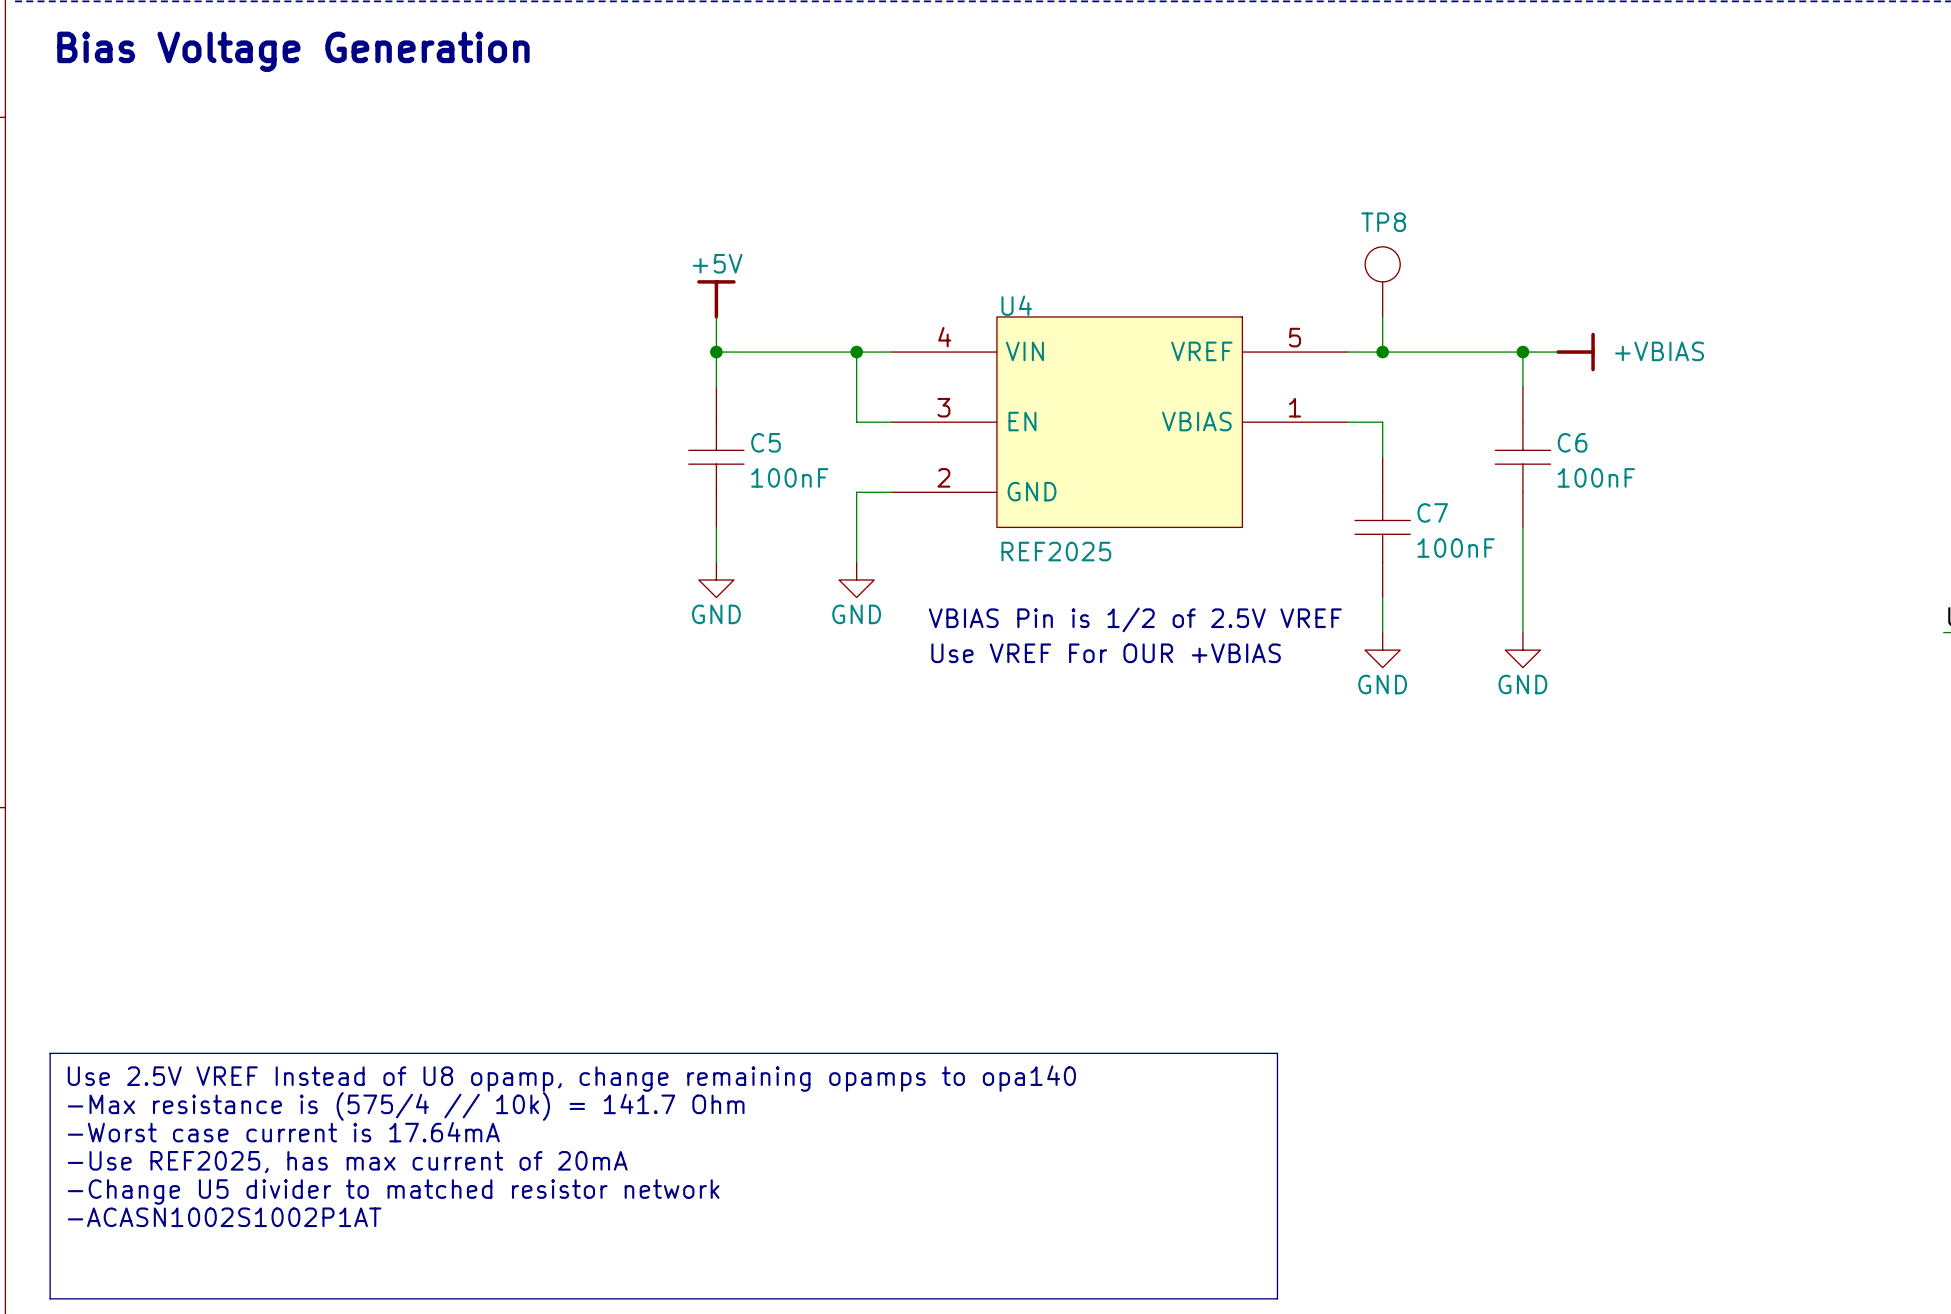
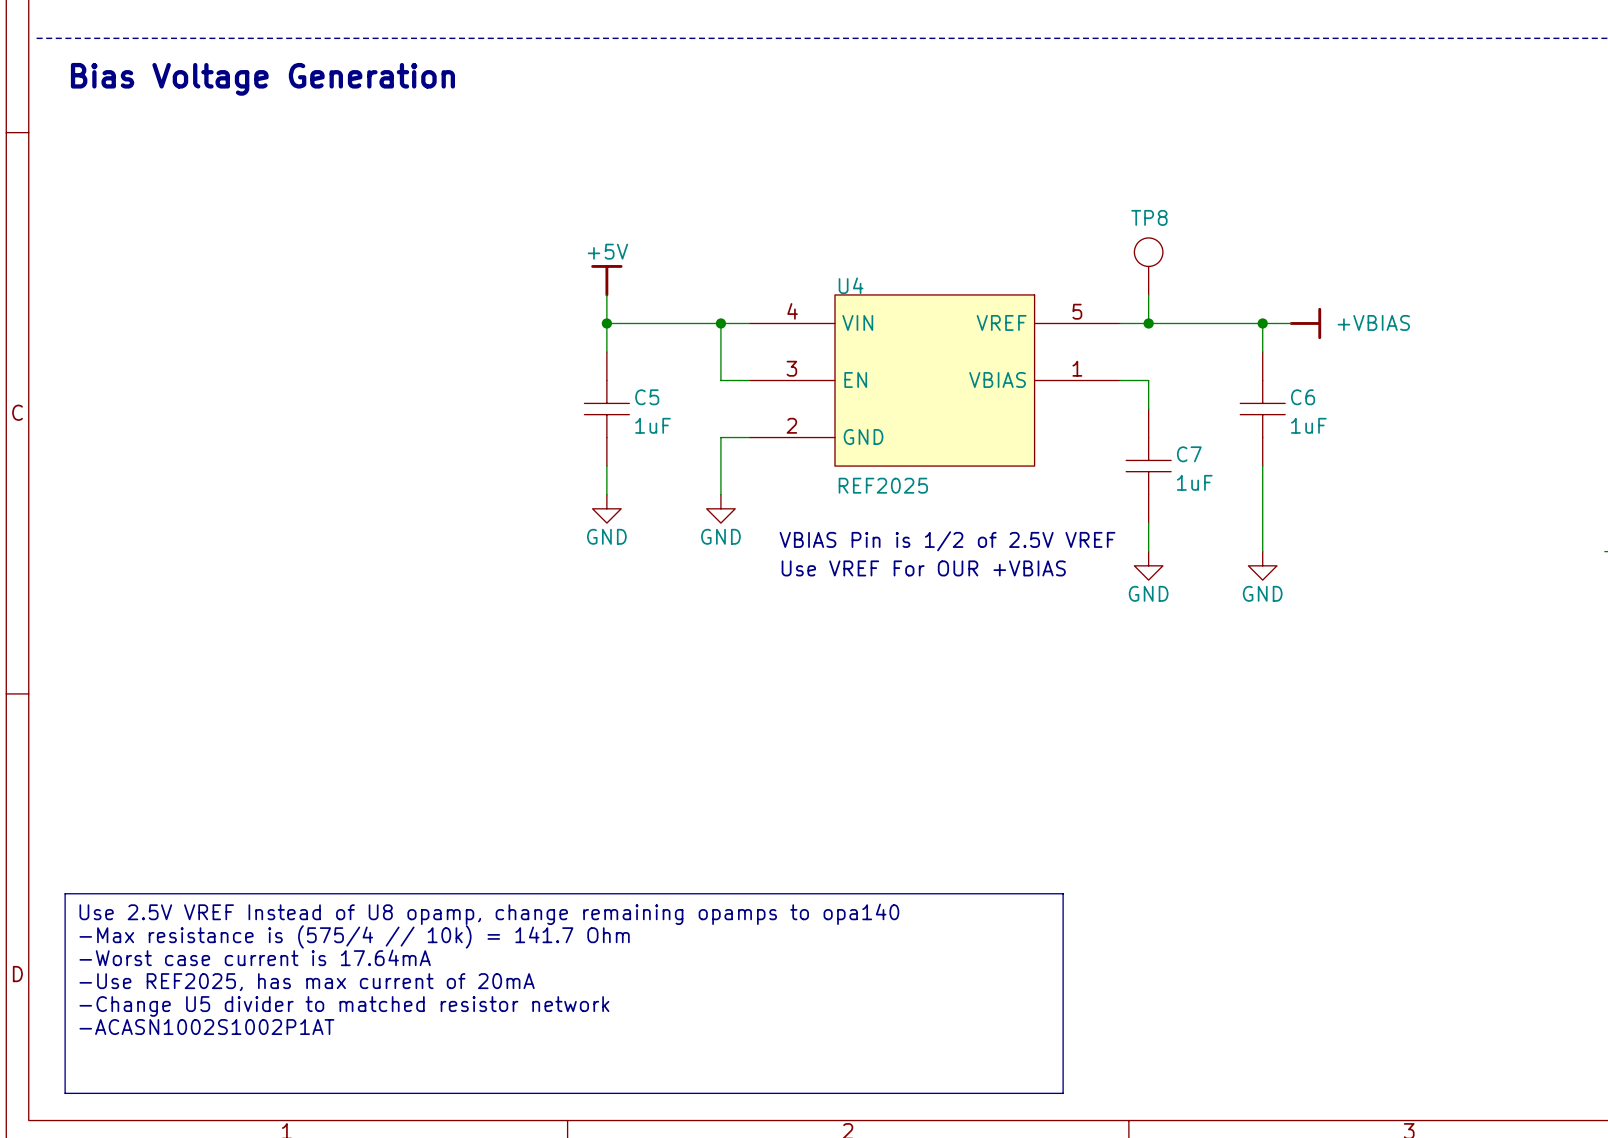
C5 value: 100nF (789, 477) -> 1uF (653, 425)
C6 value: 100nF (1596, 477) -> 1uF (1308, 425)
C7 value: 100nF (1456, 548) -> 1uF (1194, 482)

